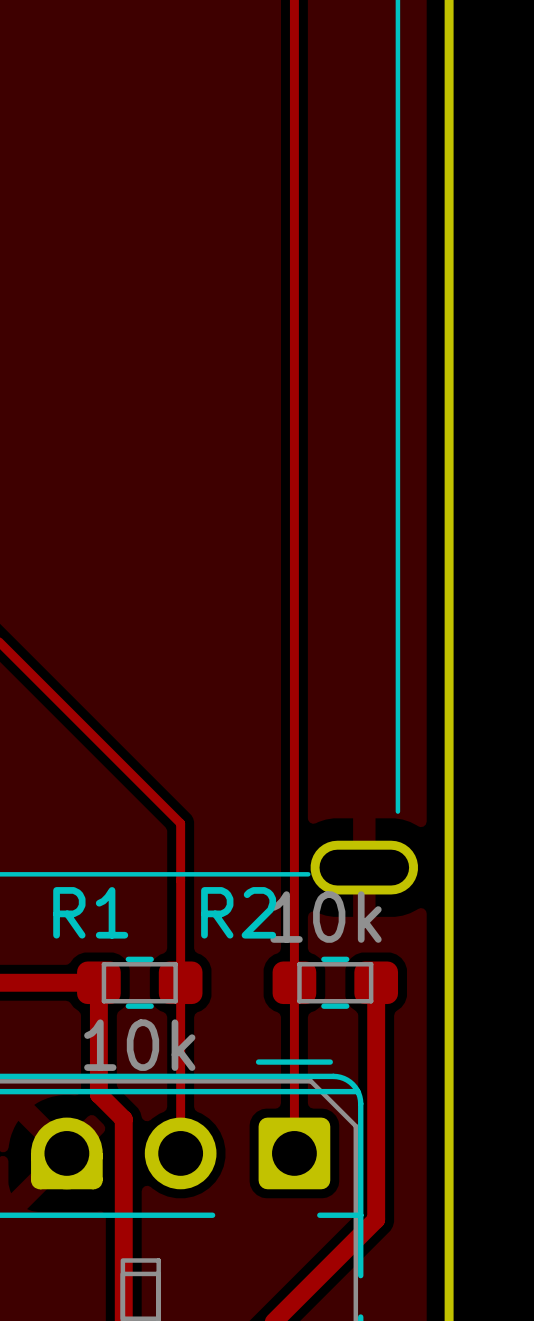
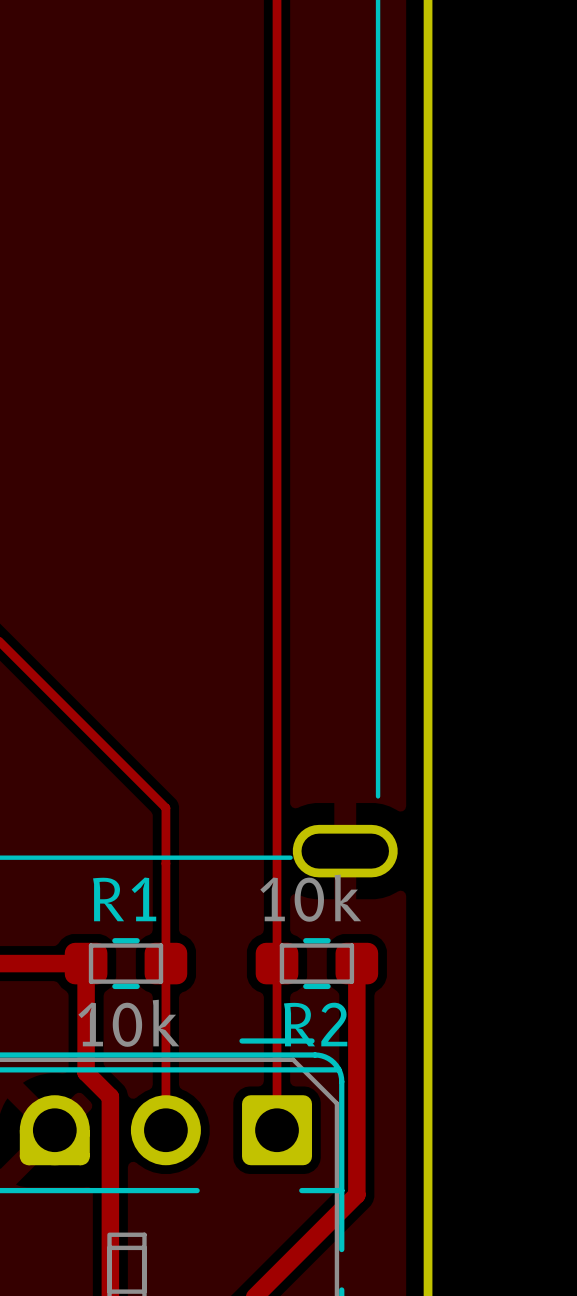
R1 name position: R1 (90, 912) -> R1 (124, 899)
R2 name position: R2 (238, 912) -> R2 (315, 1024)

